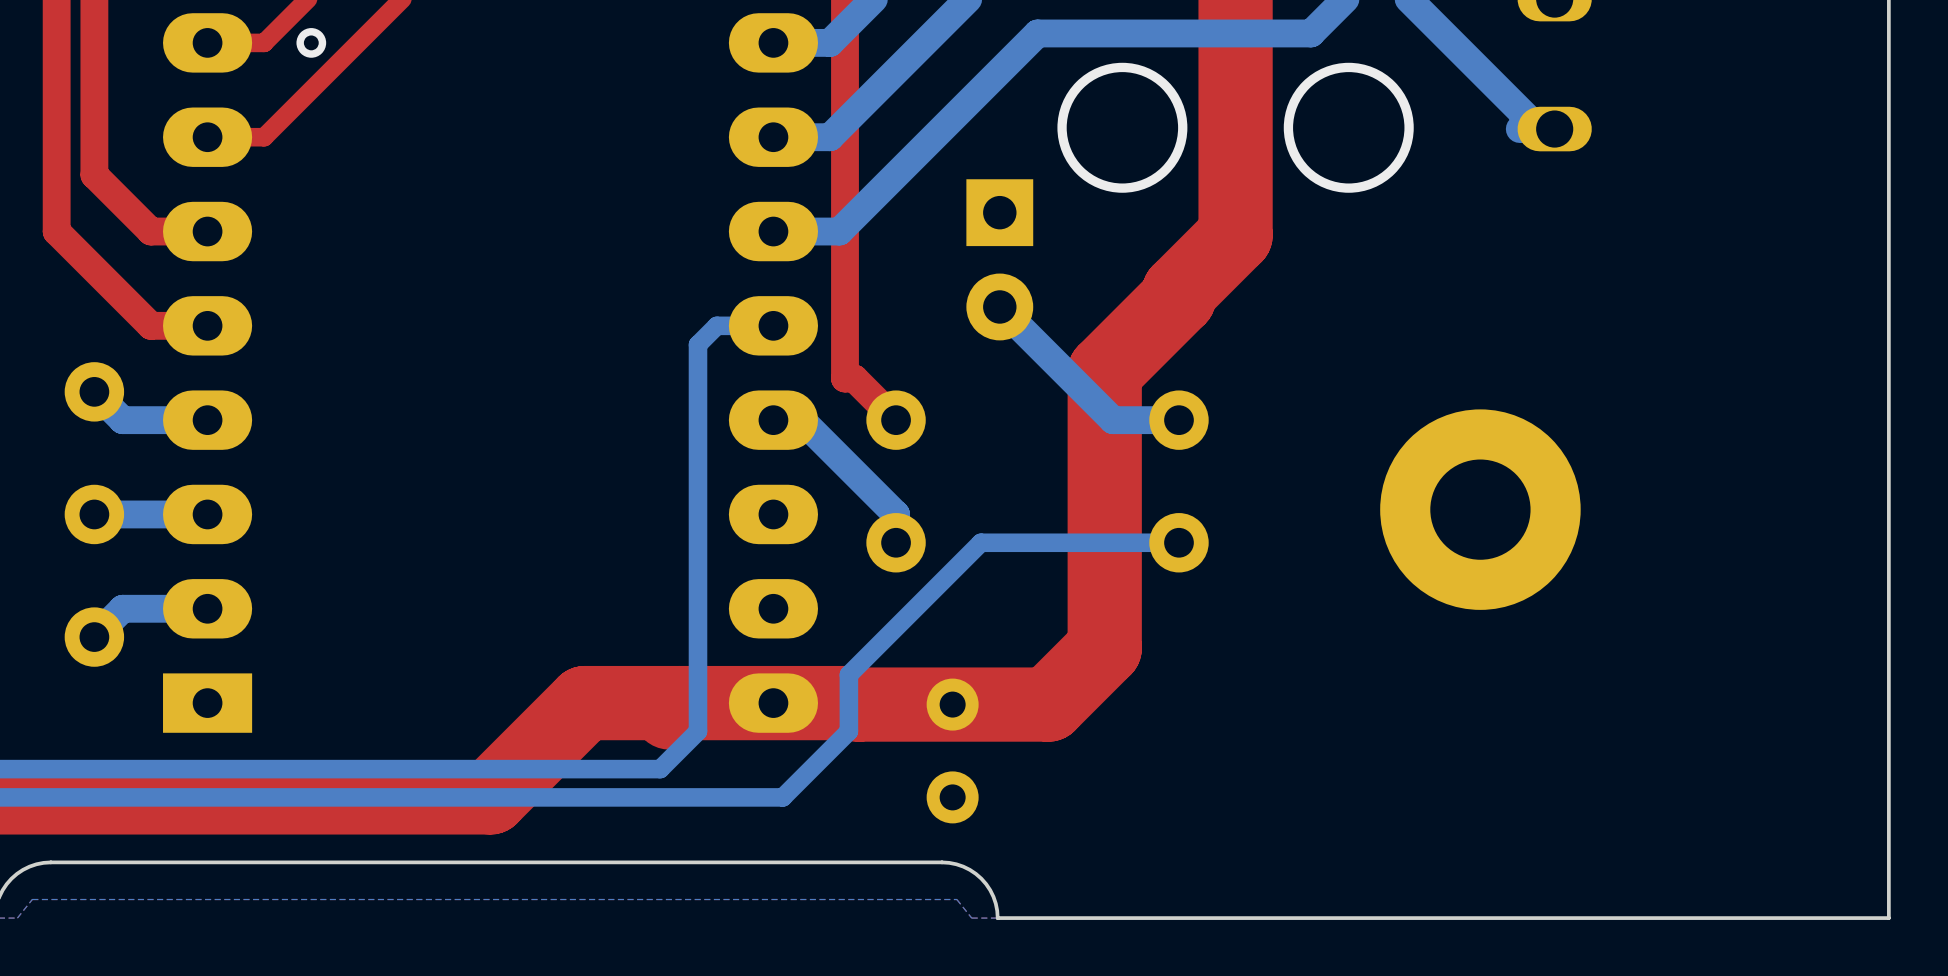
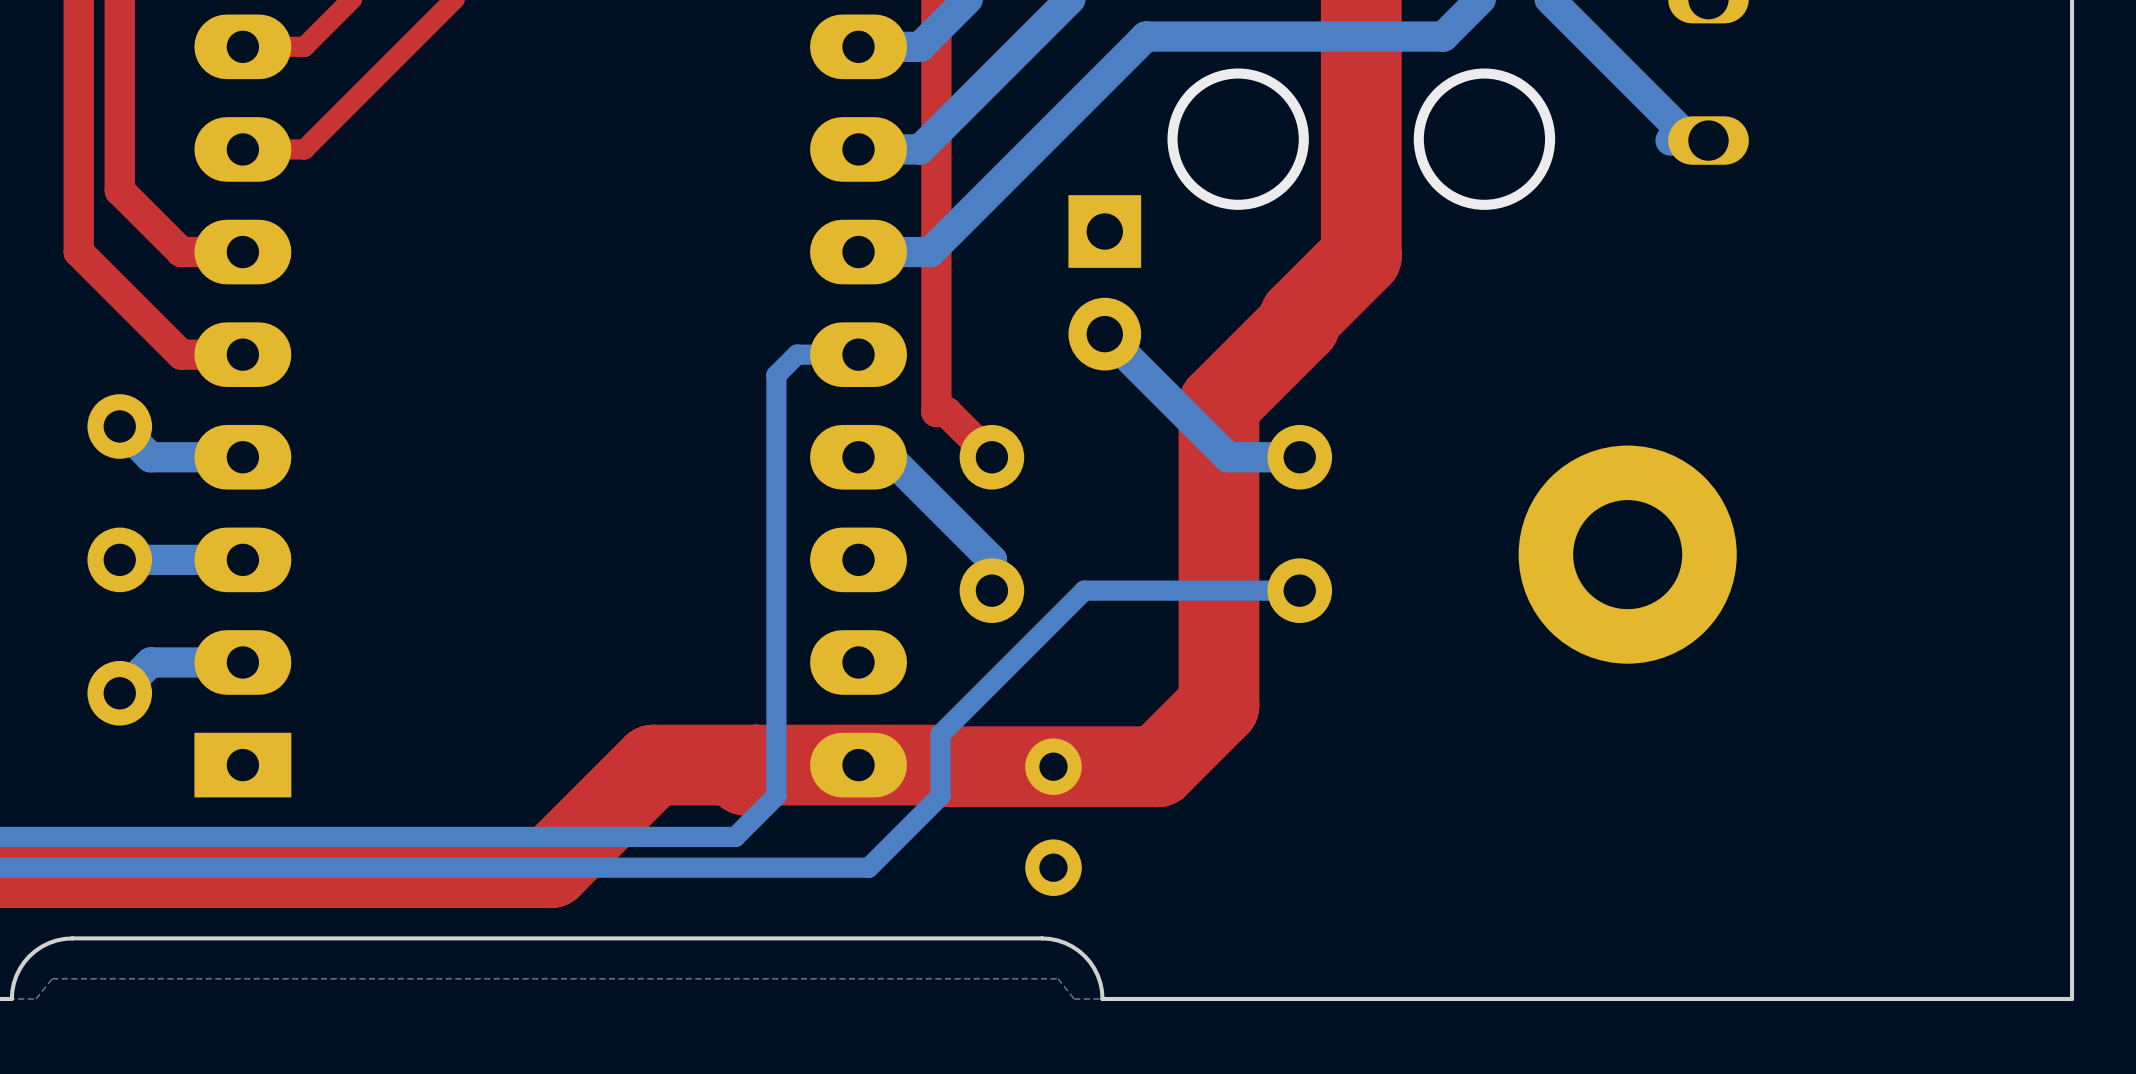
via: (311, 42) -> none

